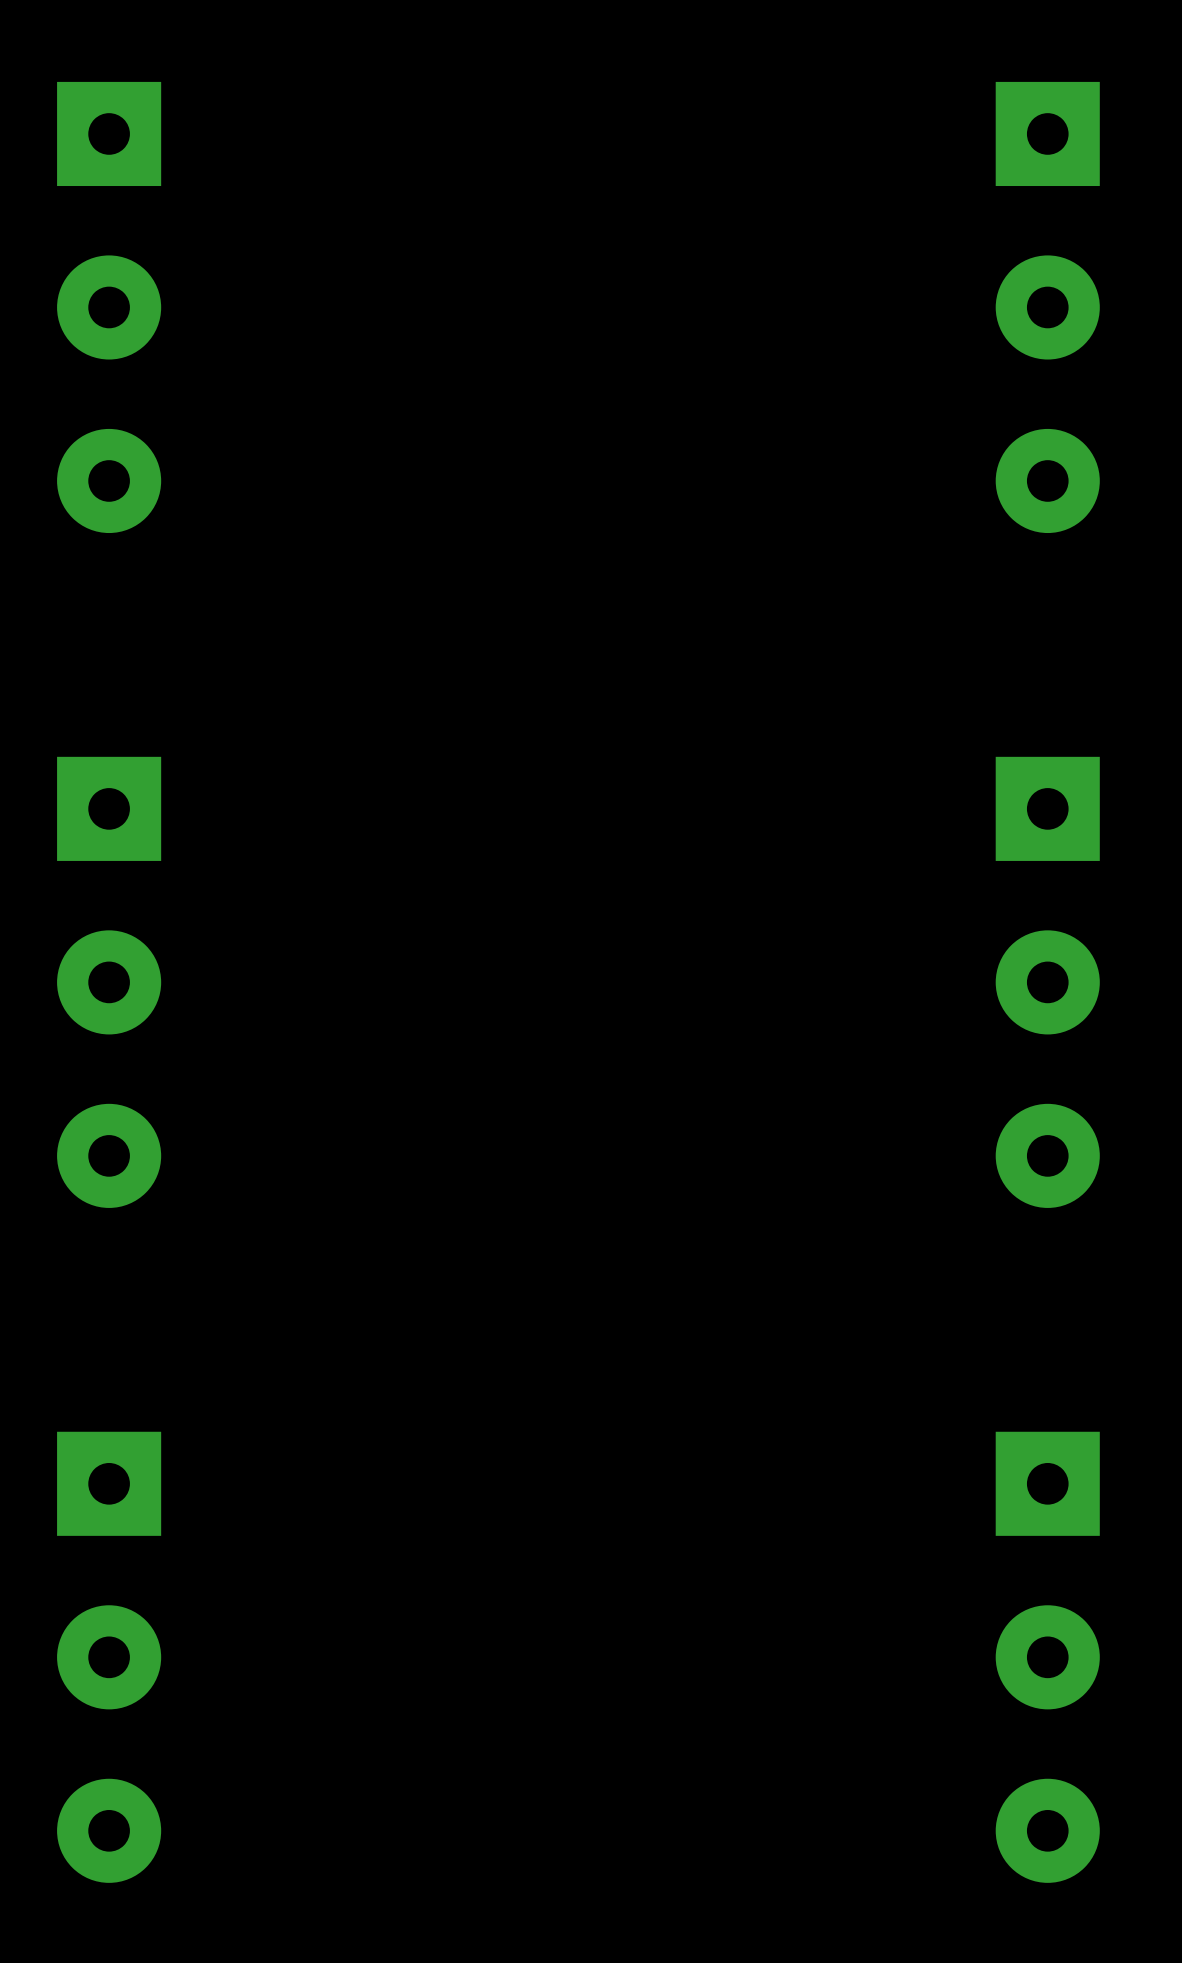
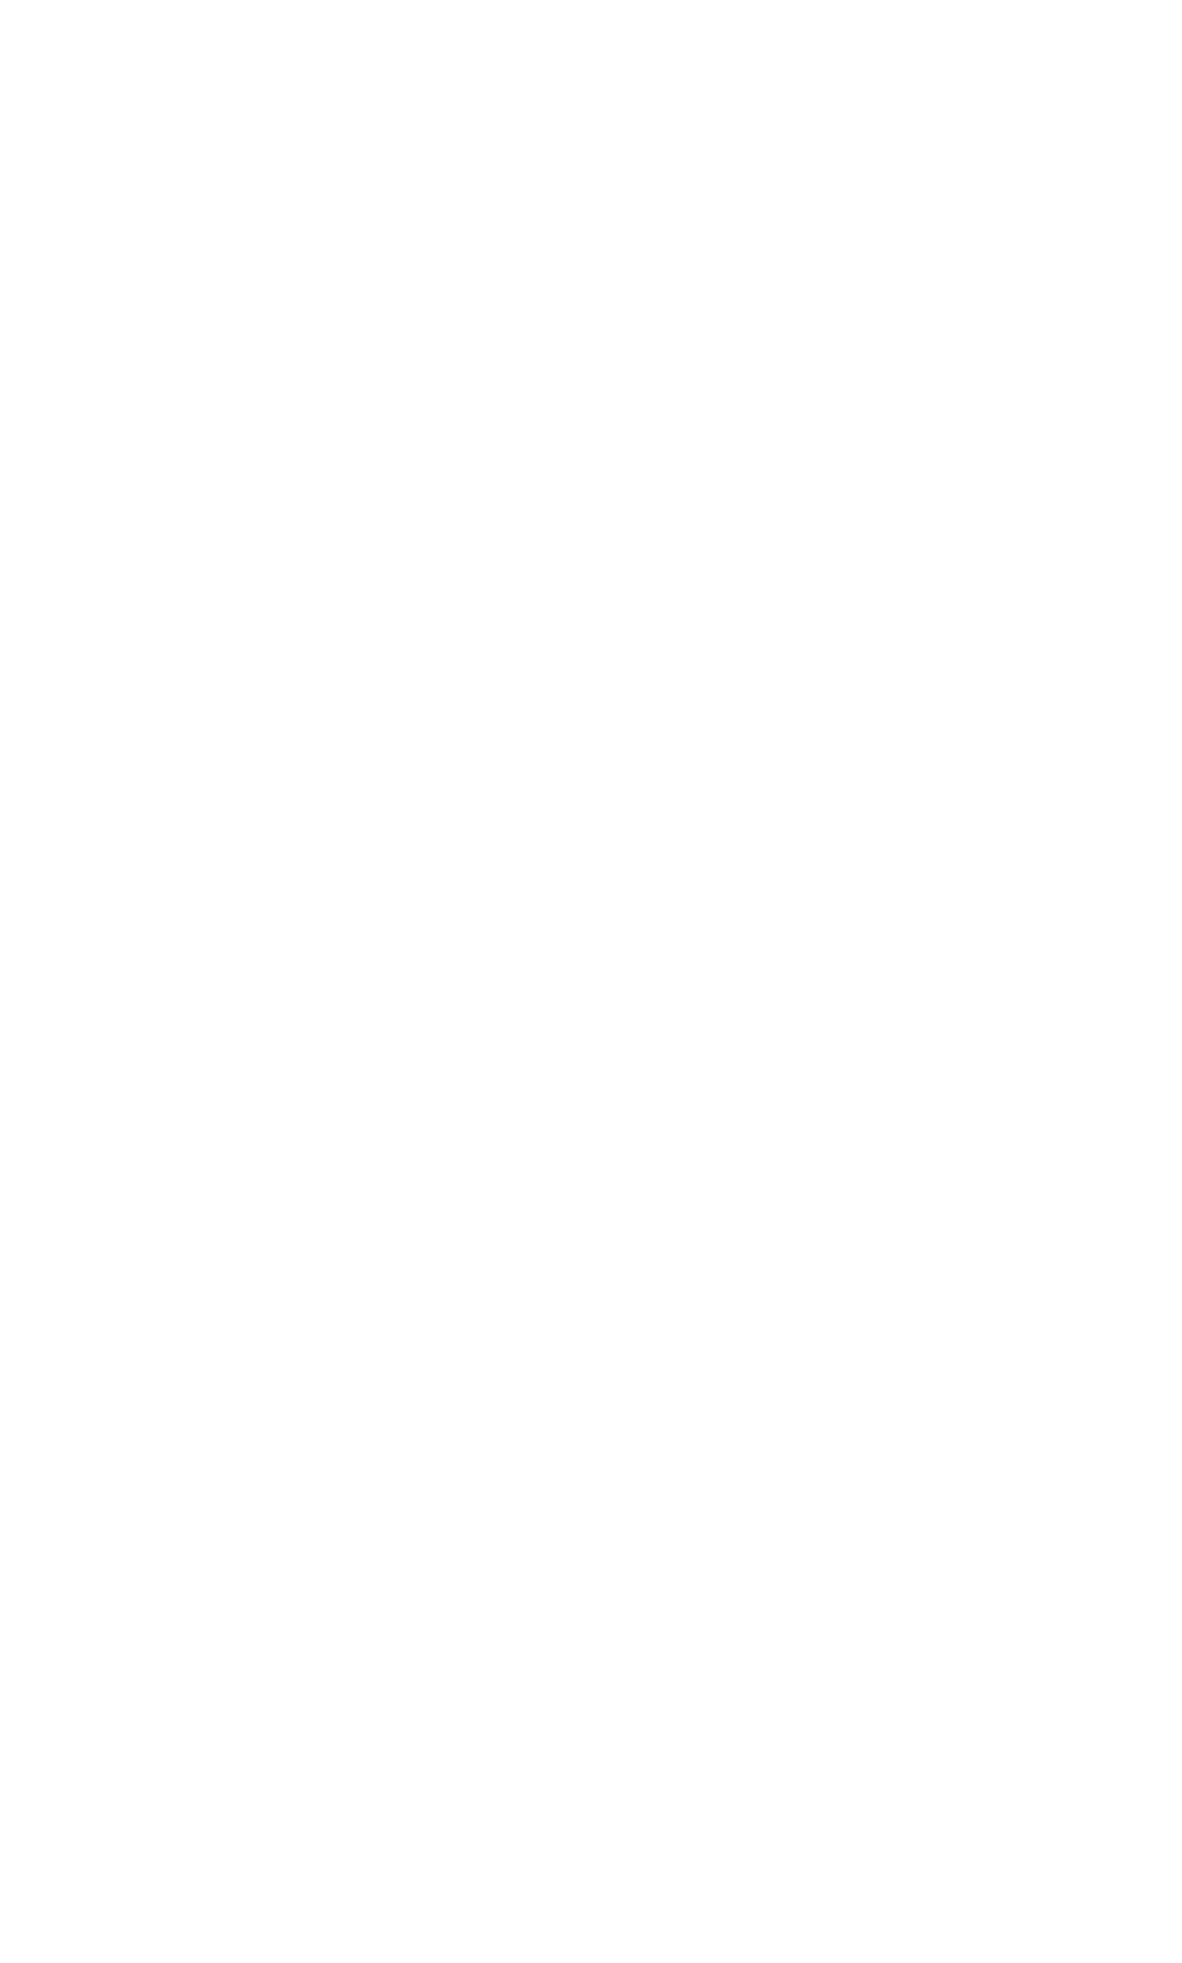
part: (109, 307) -> none
part: (1047, 307) -> none
part: (109, 982) -> none
part: (1047, 982) -> none
part: (109, 1657) -> none
part: (1047, 1657) -> none

